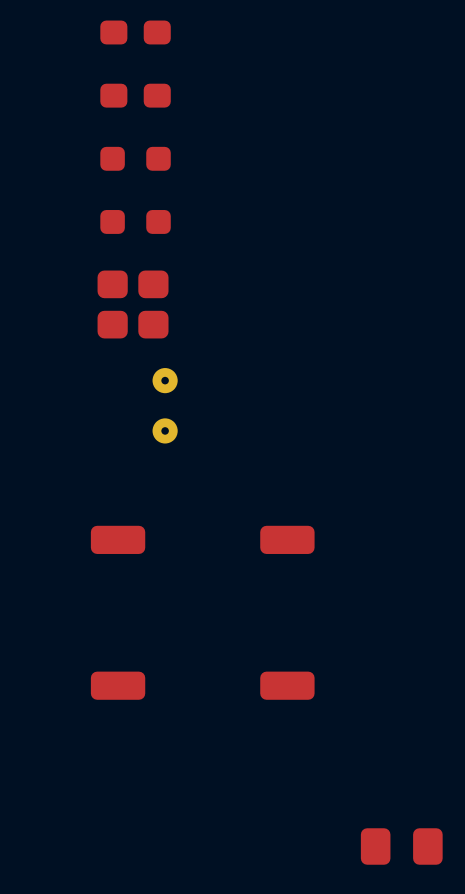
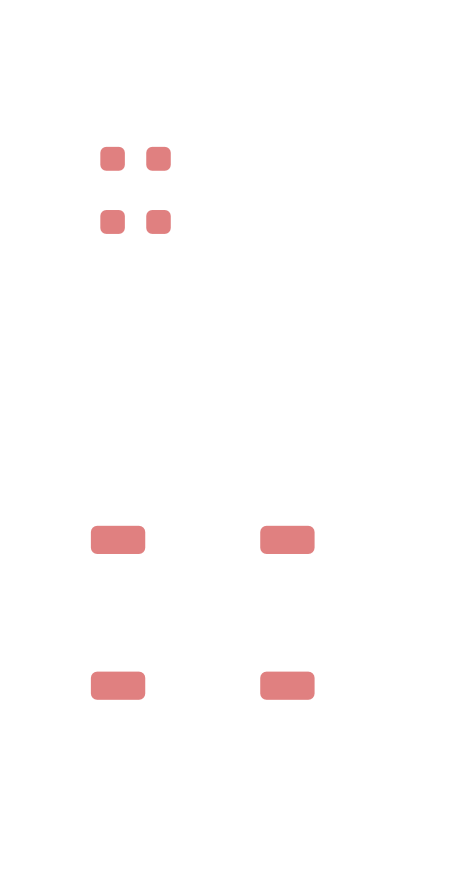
part: (135, 32) -> none
part: (135, 95) -> none
part: (133, 304) -> none
part: (165, 380) -> none
part: (165, 430) -> none
part: (401, 846) -> none

